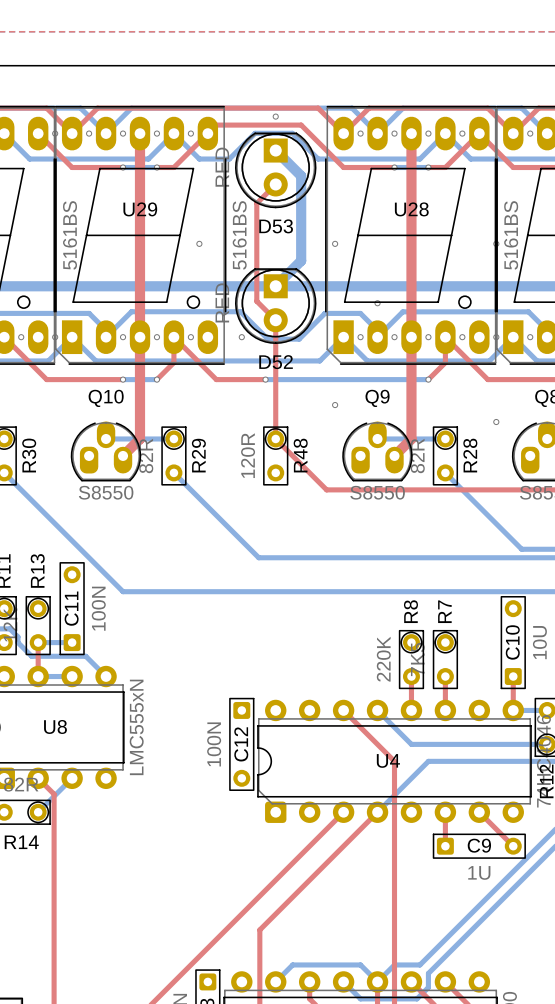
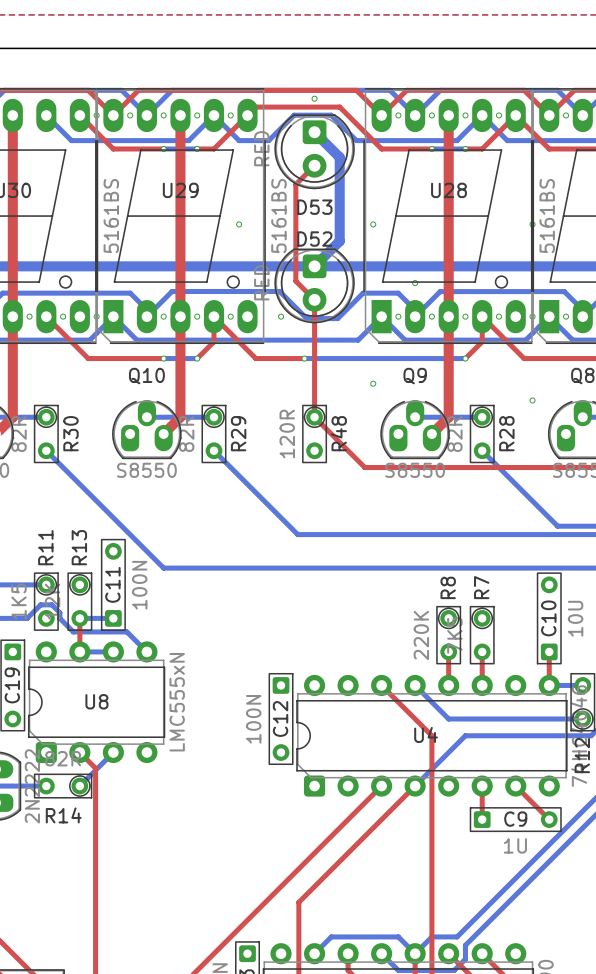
D53 footprint: [234, 132, 317, 209] -> [274, 114, 355, 190]
D52 footprint: [234, 268, 317, 344] -> [274, 248, 355, 324]
D52 name position: D52 (276, 362) -> D52 (314, 239)

